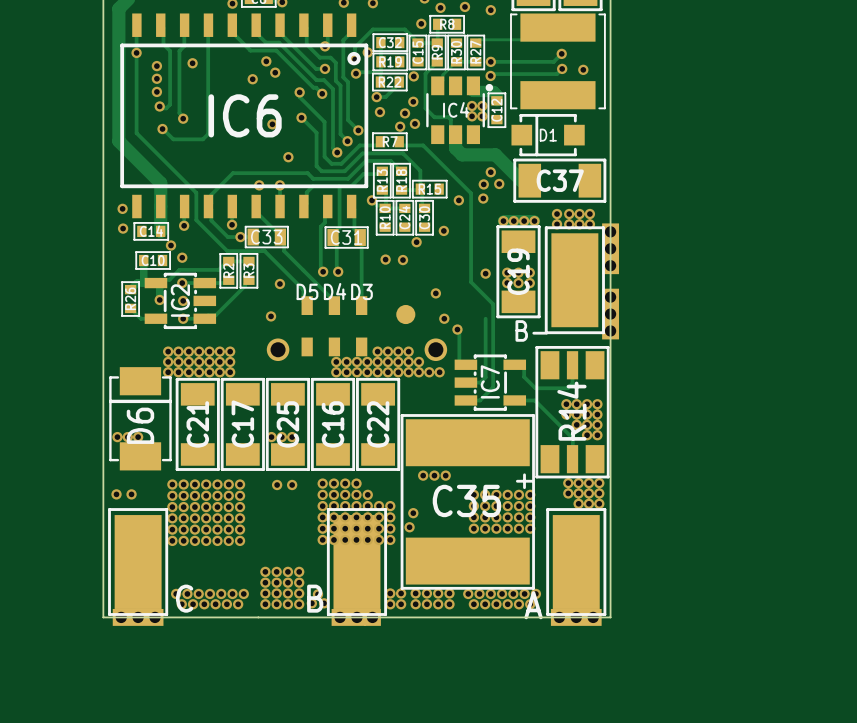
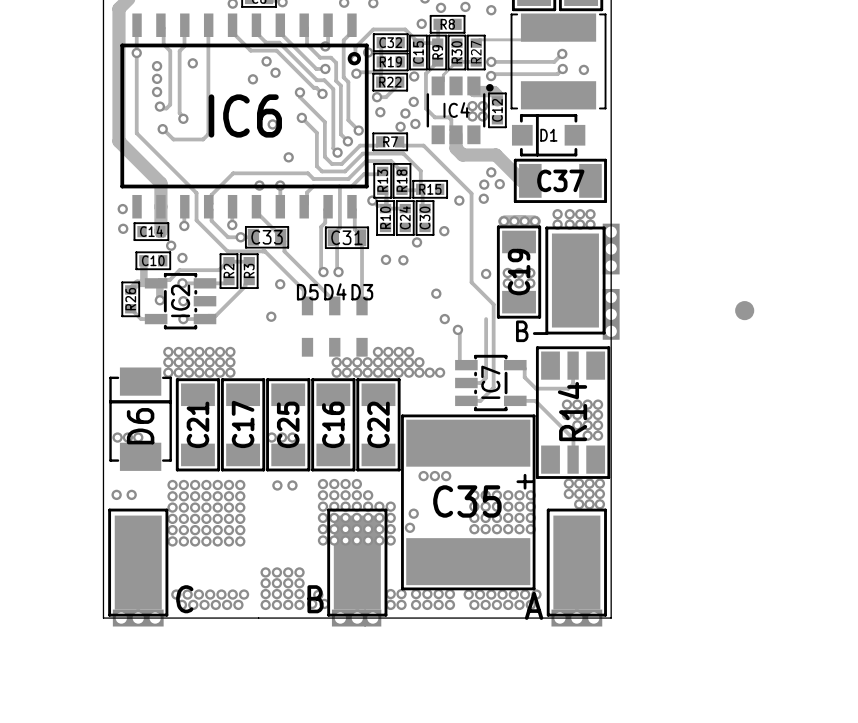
part position: (405, 314) -> (744, 310)
part: (278, 349) -> none
part: (435, 349) -> none

